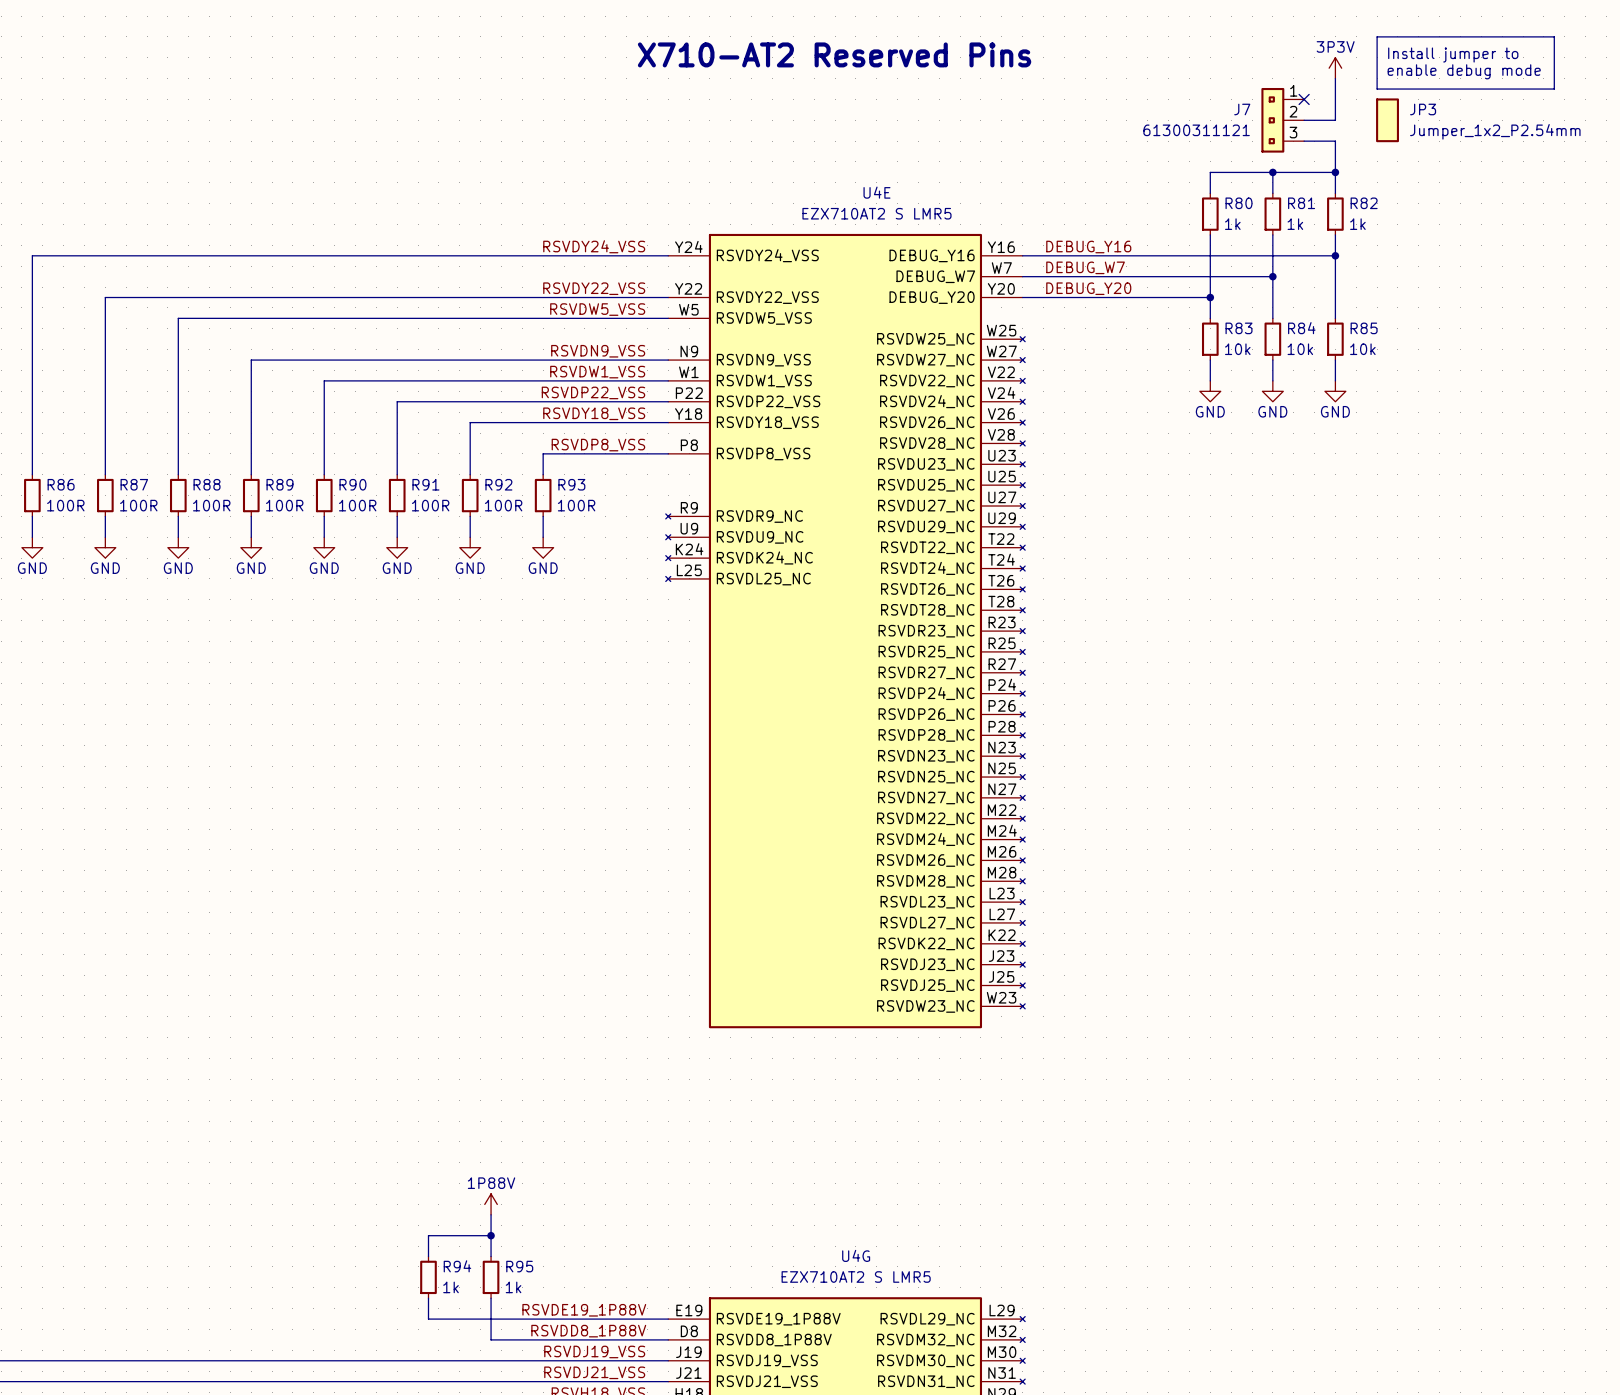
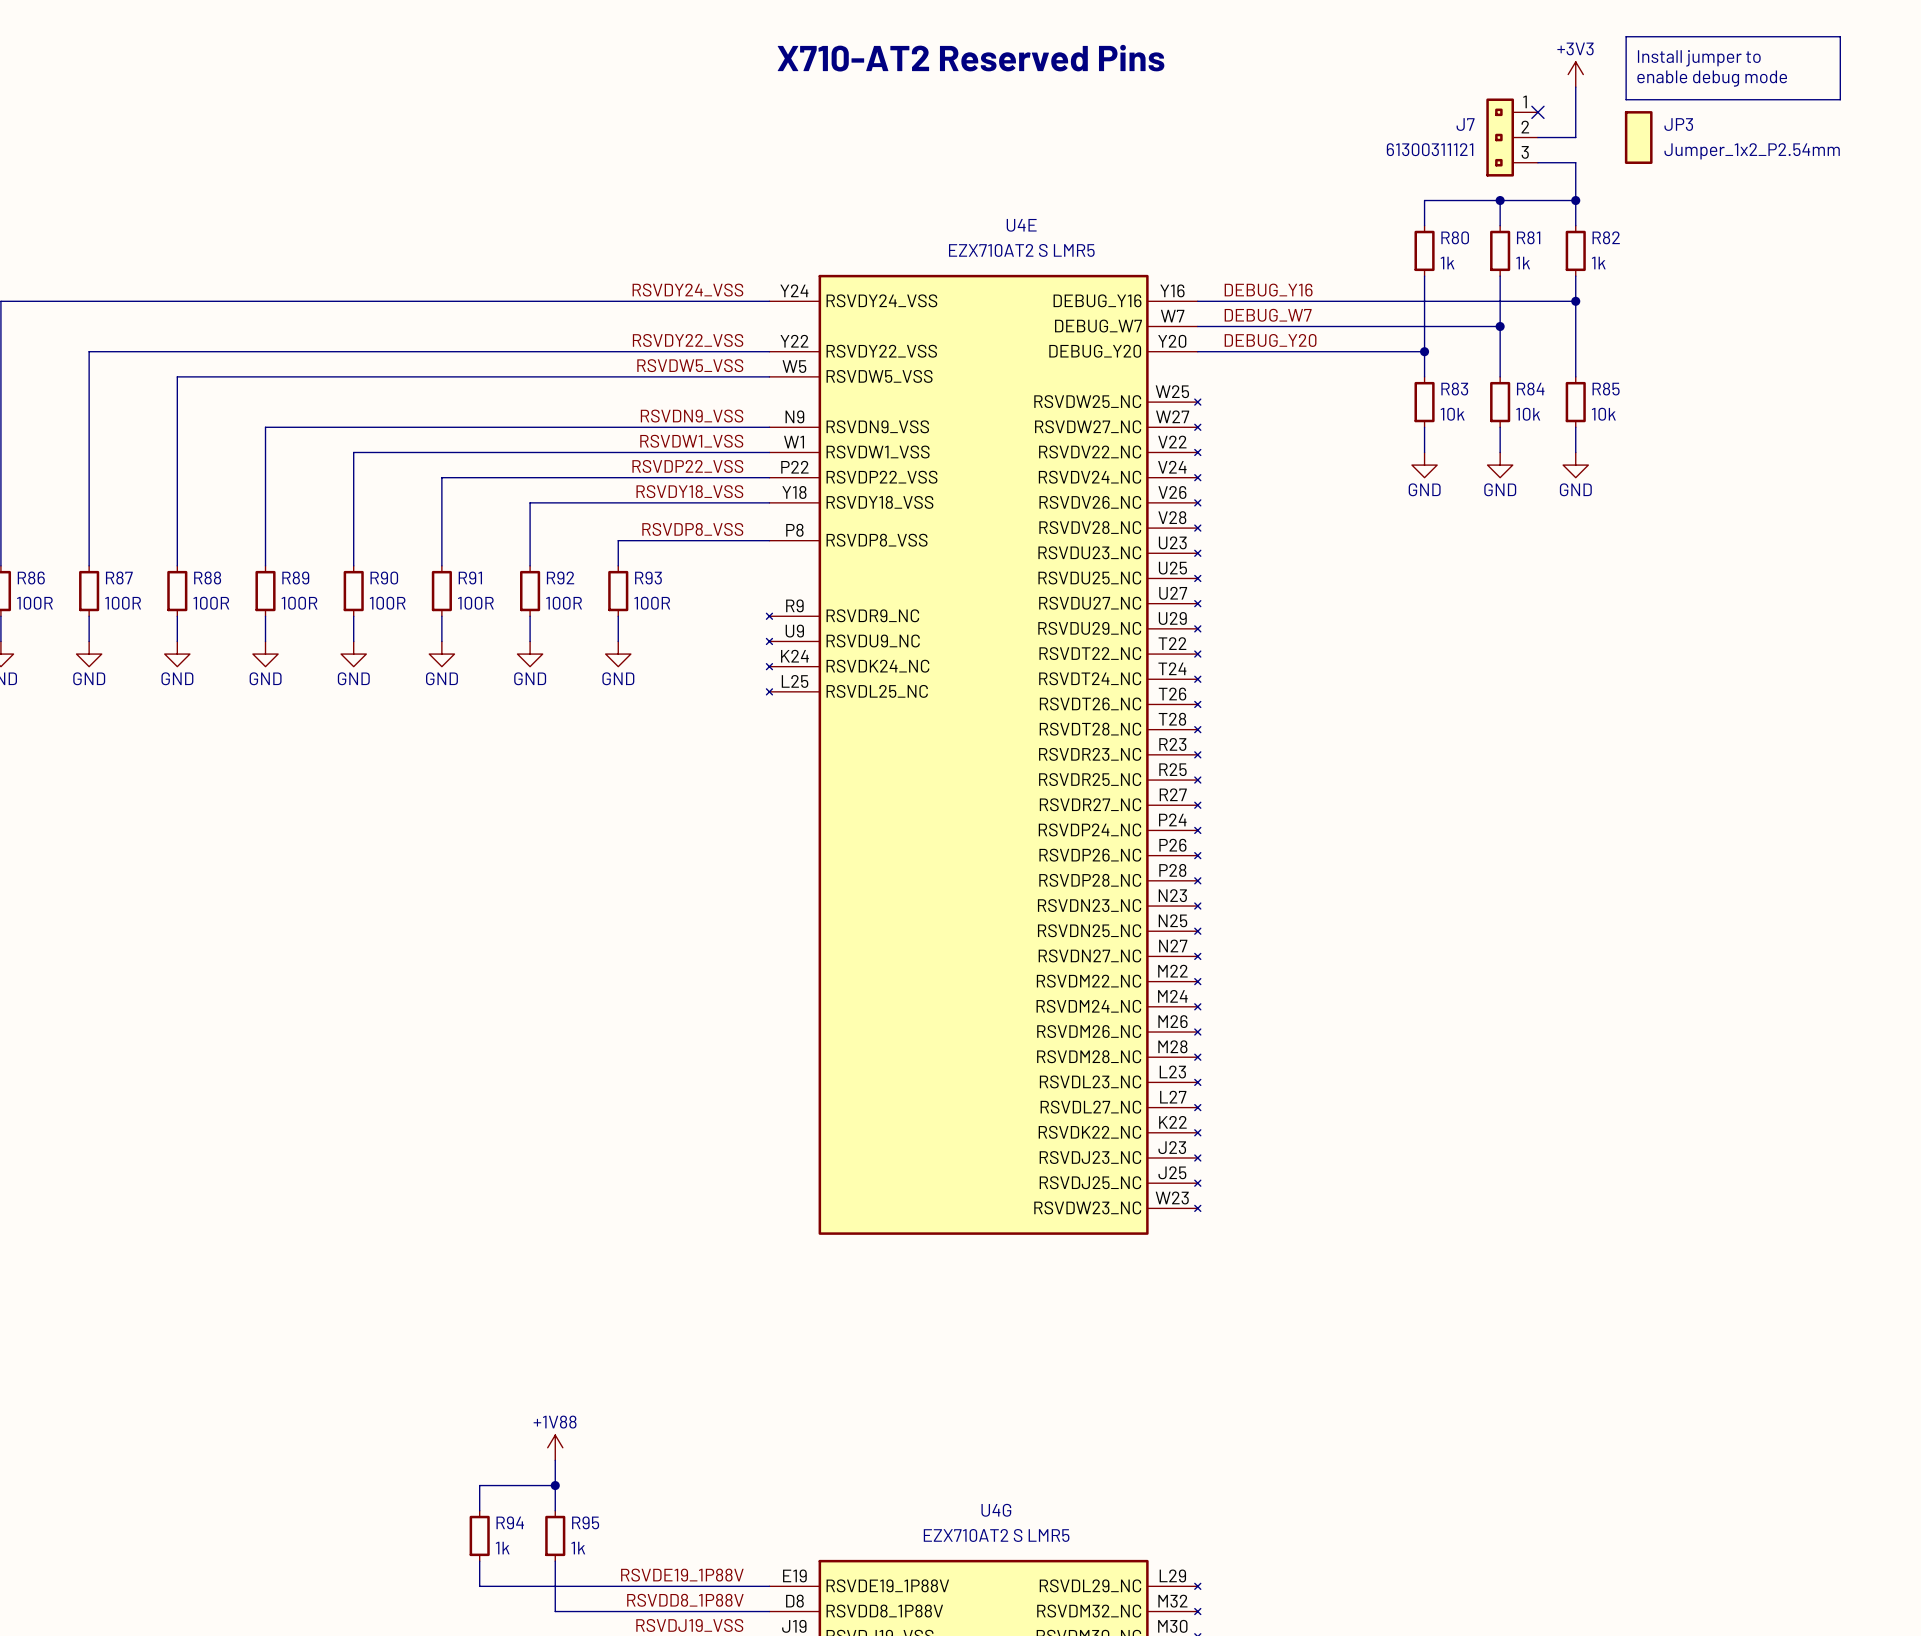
power symbol: 3P3V (1335, 68) -> +3V3 (1575, 74)
power symbol: 1P88V (491, 1204) -> +1V88 (555, 1447)

